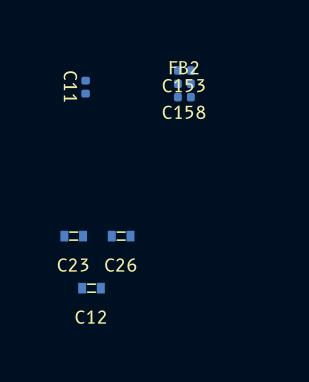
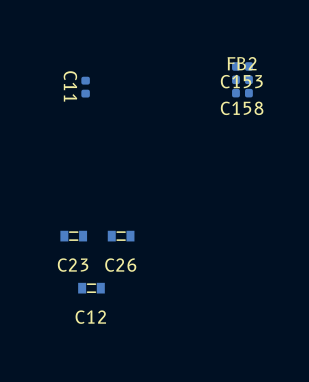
C153 position: (184, 70) -> (242, 66)
FB2 position: (184, 83) -> (242, 79)
C158 position: (184, 97) -> (242, 93)

